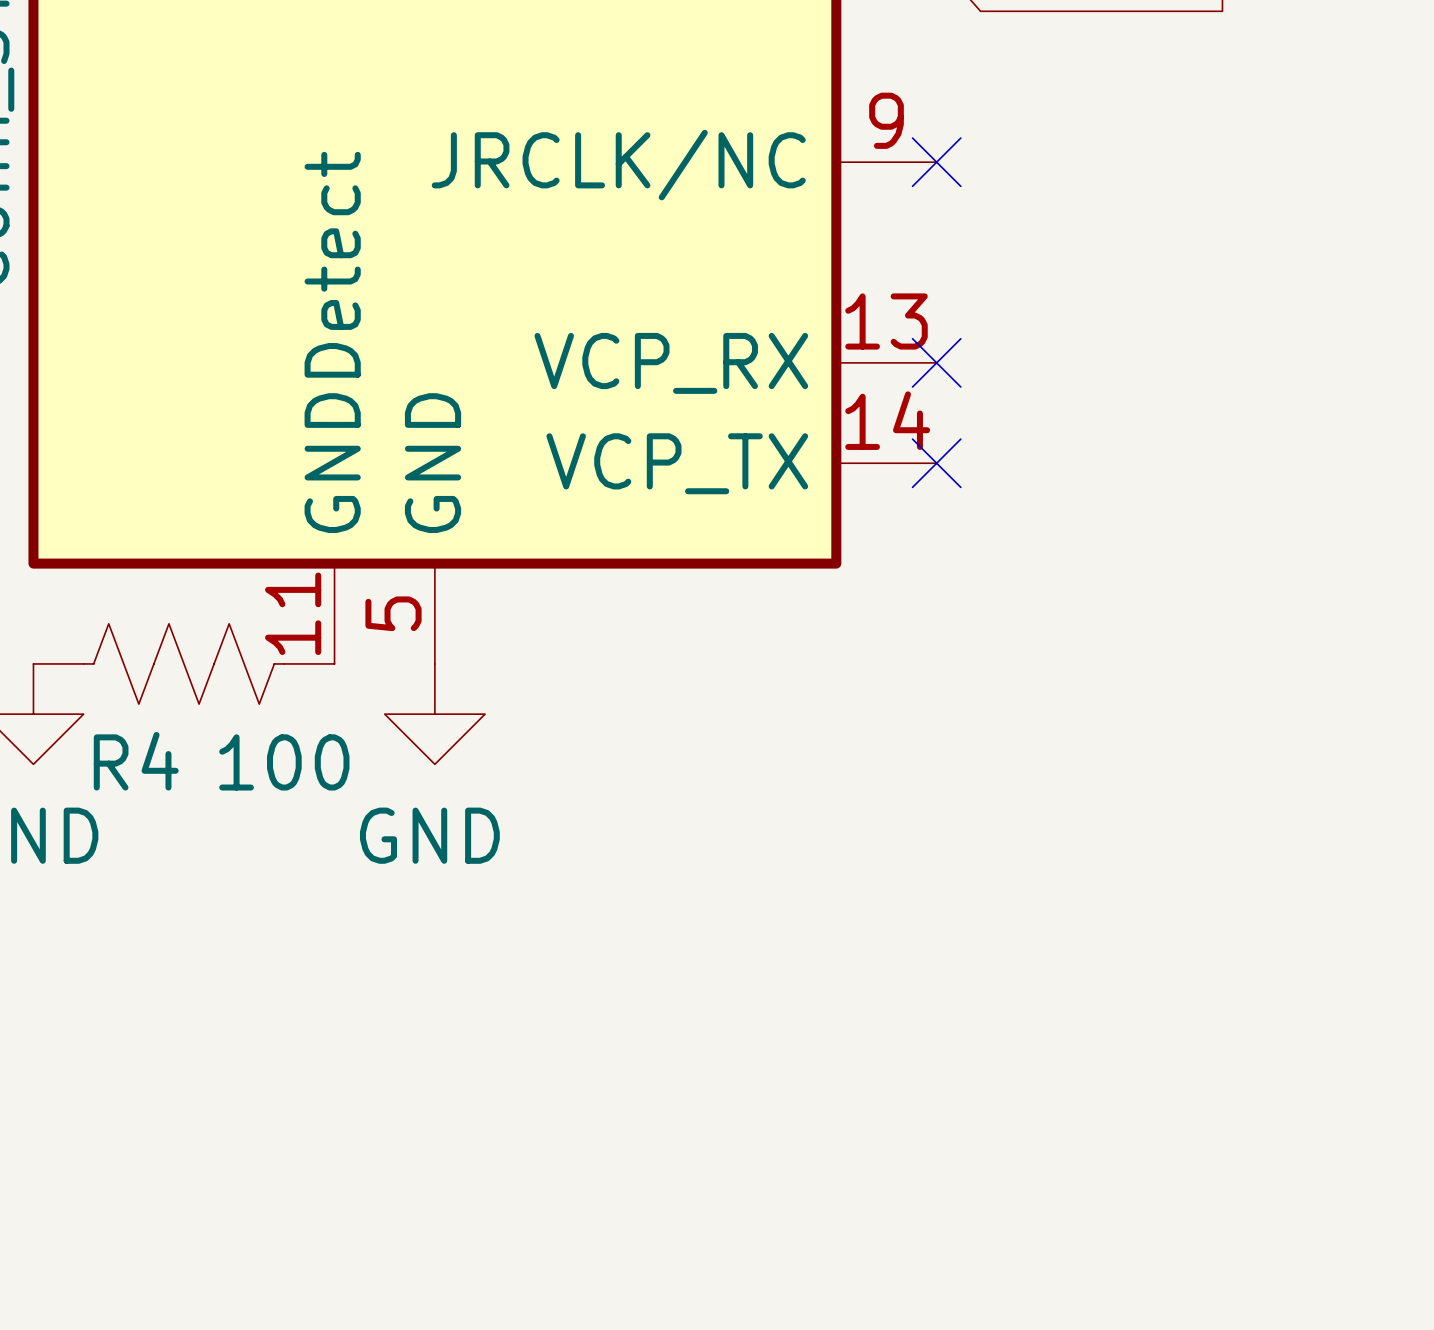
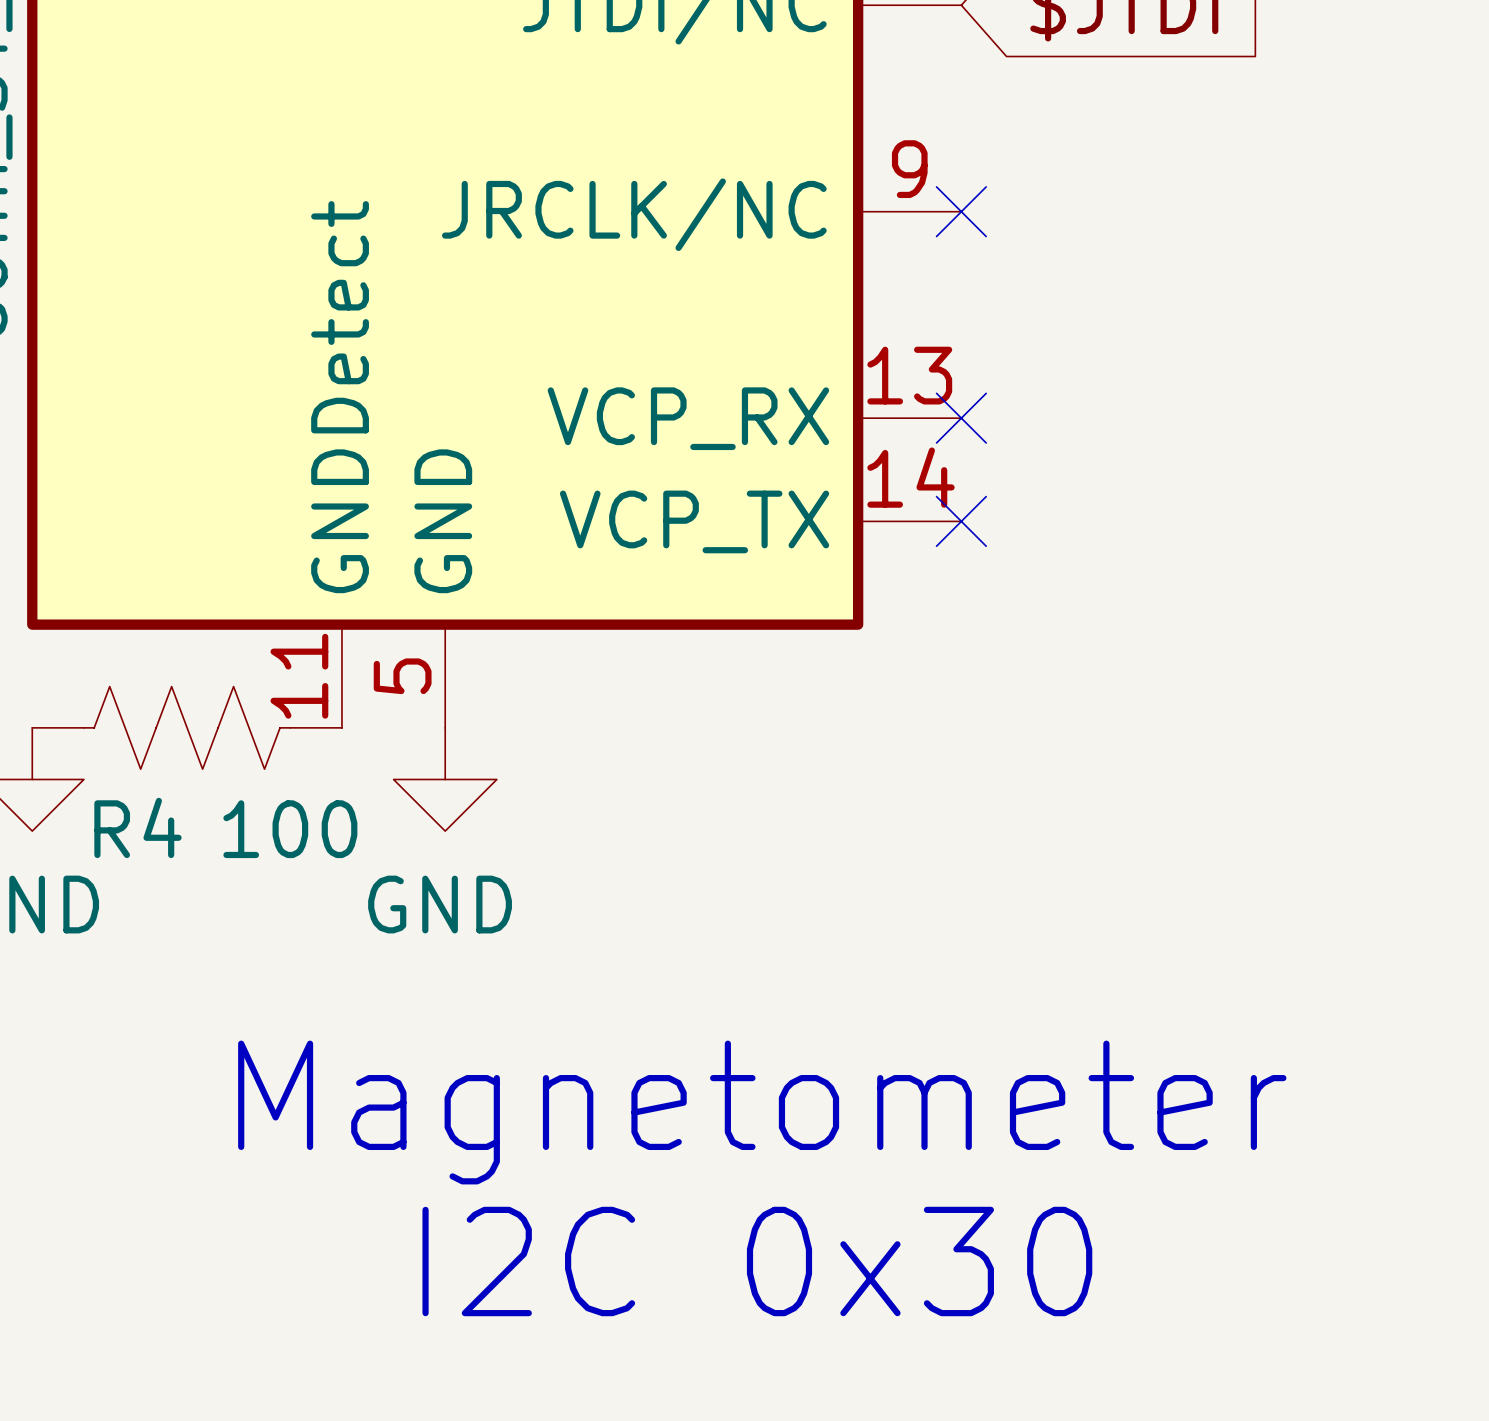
text: none -> Magnetometer (762, 1112)
text: none -> I2C 0x30 (757, 1261)

